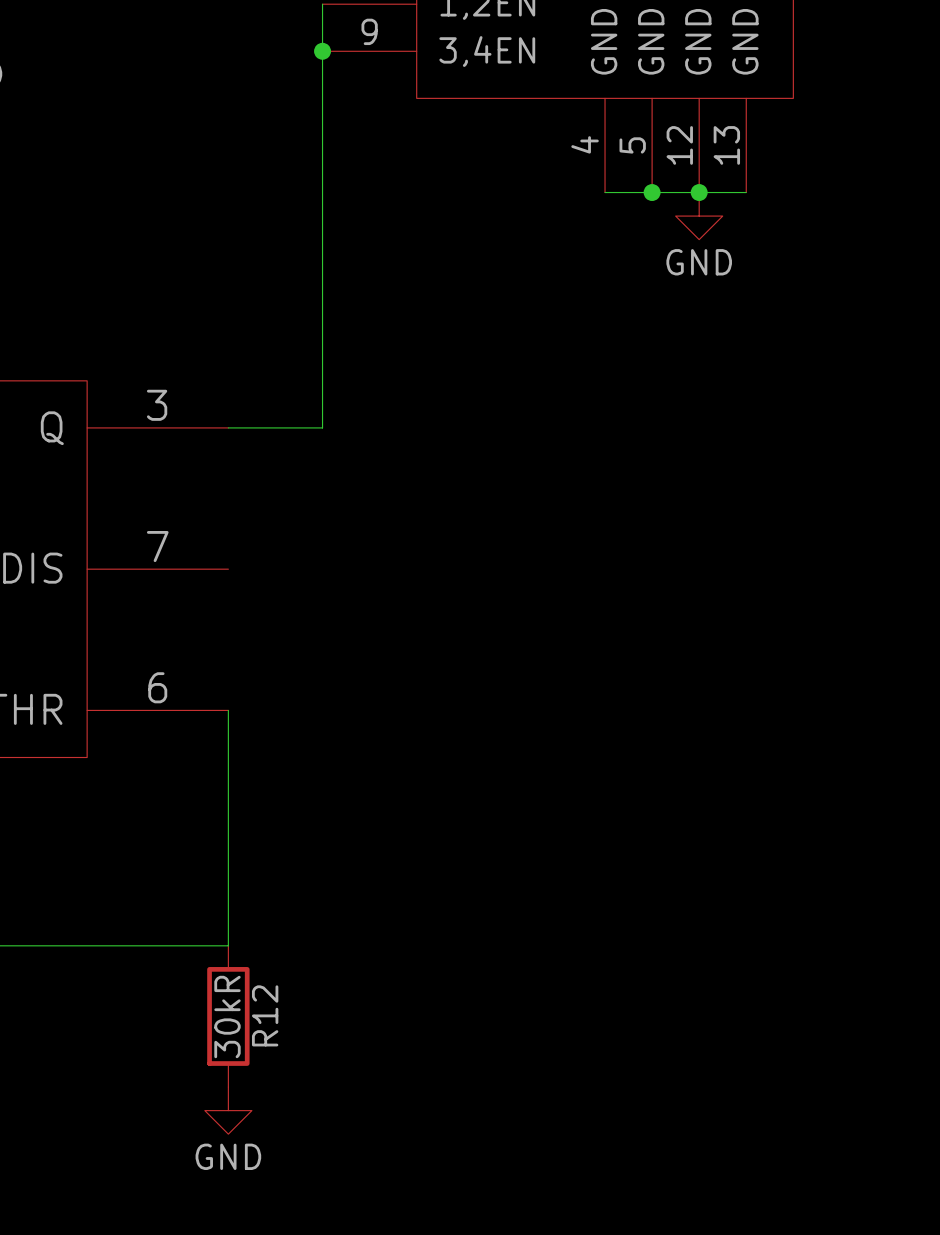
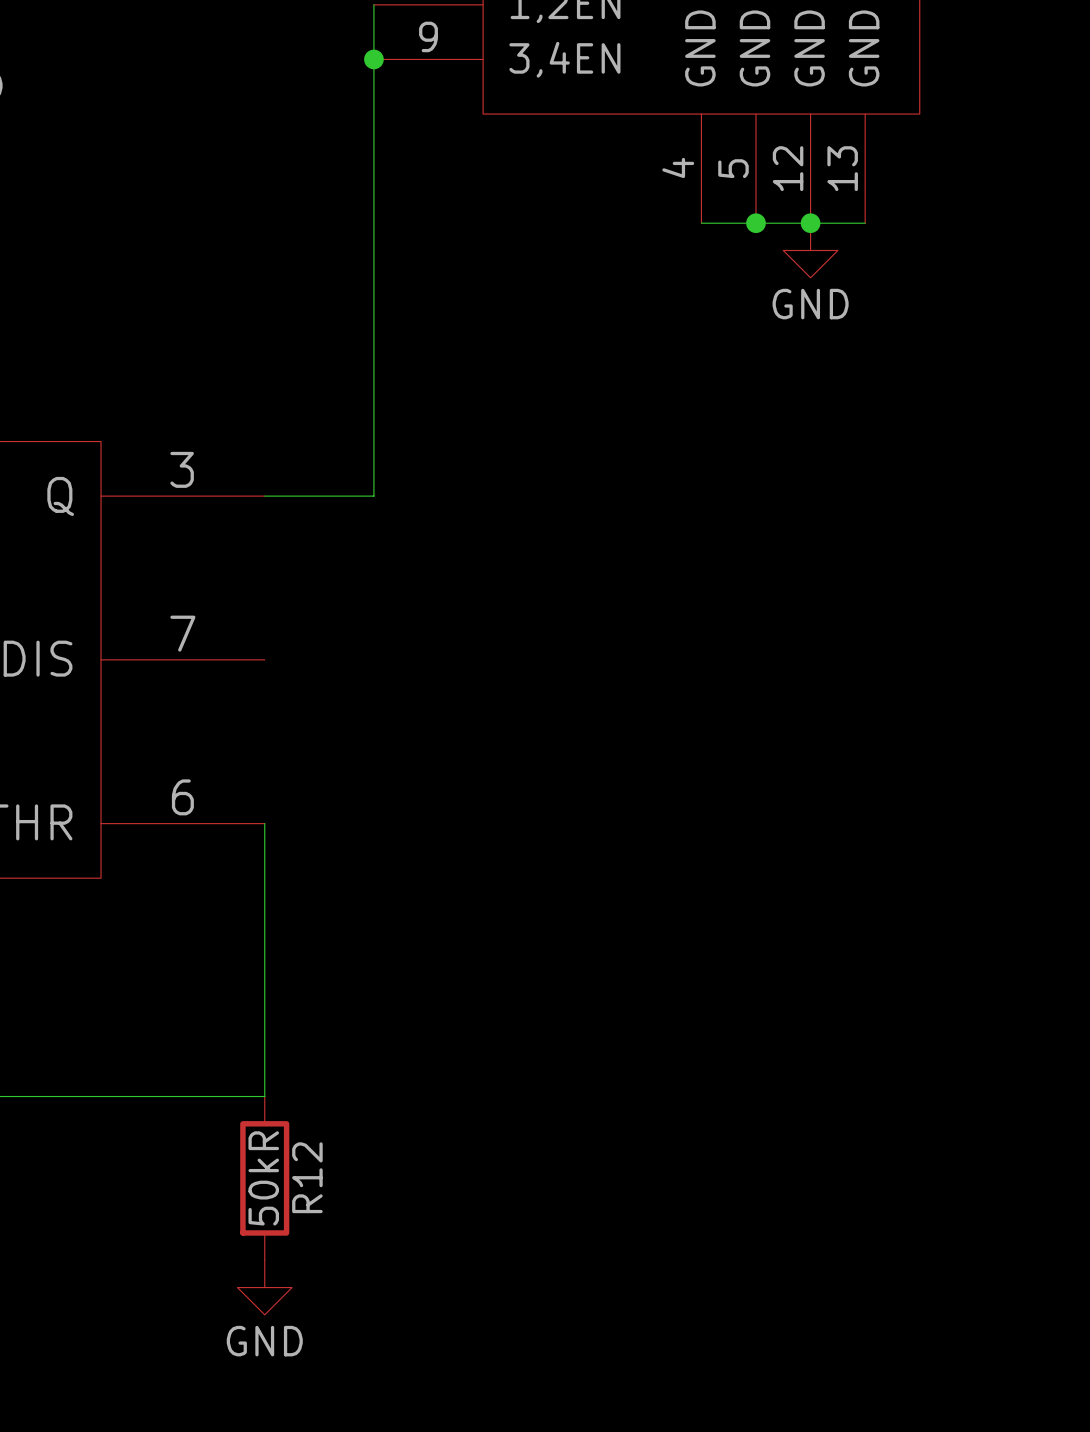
R12 value: 30kR (227, 1017) -> 50kR (263, 1178)

